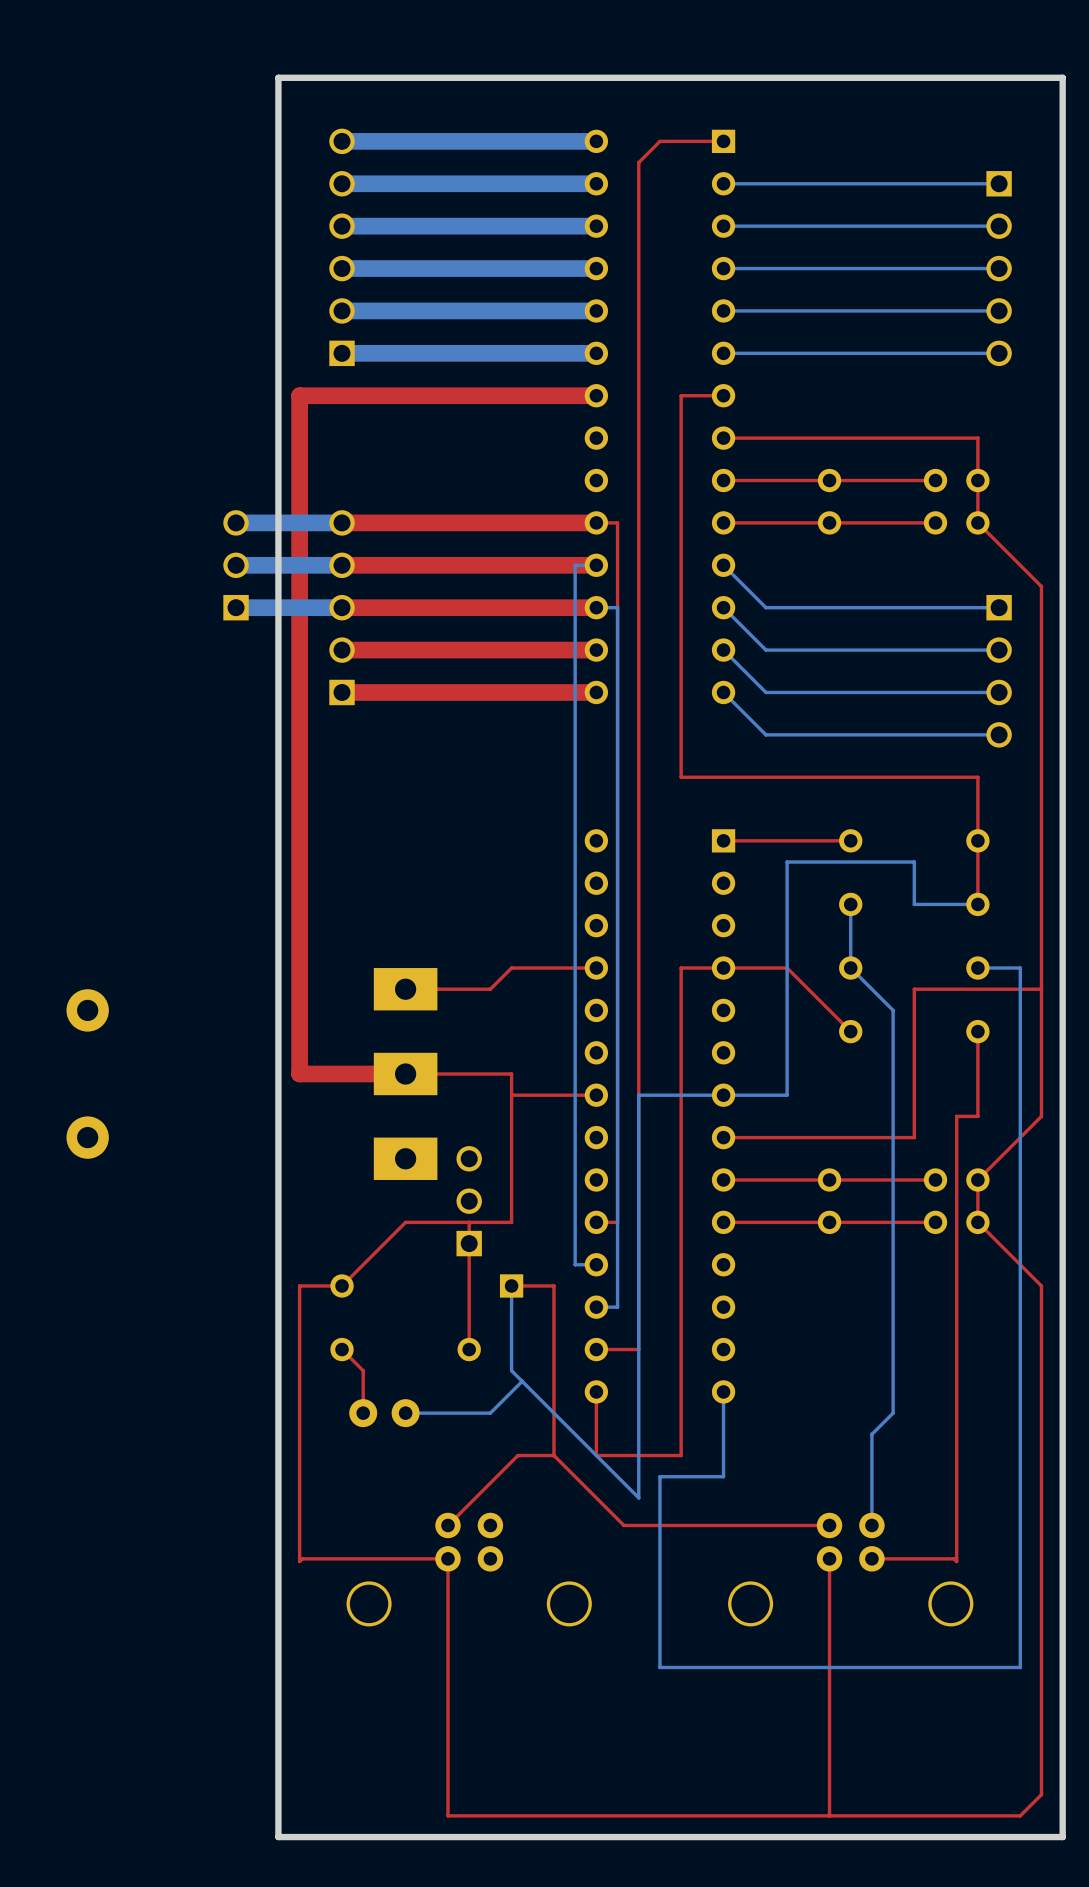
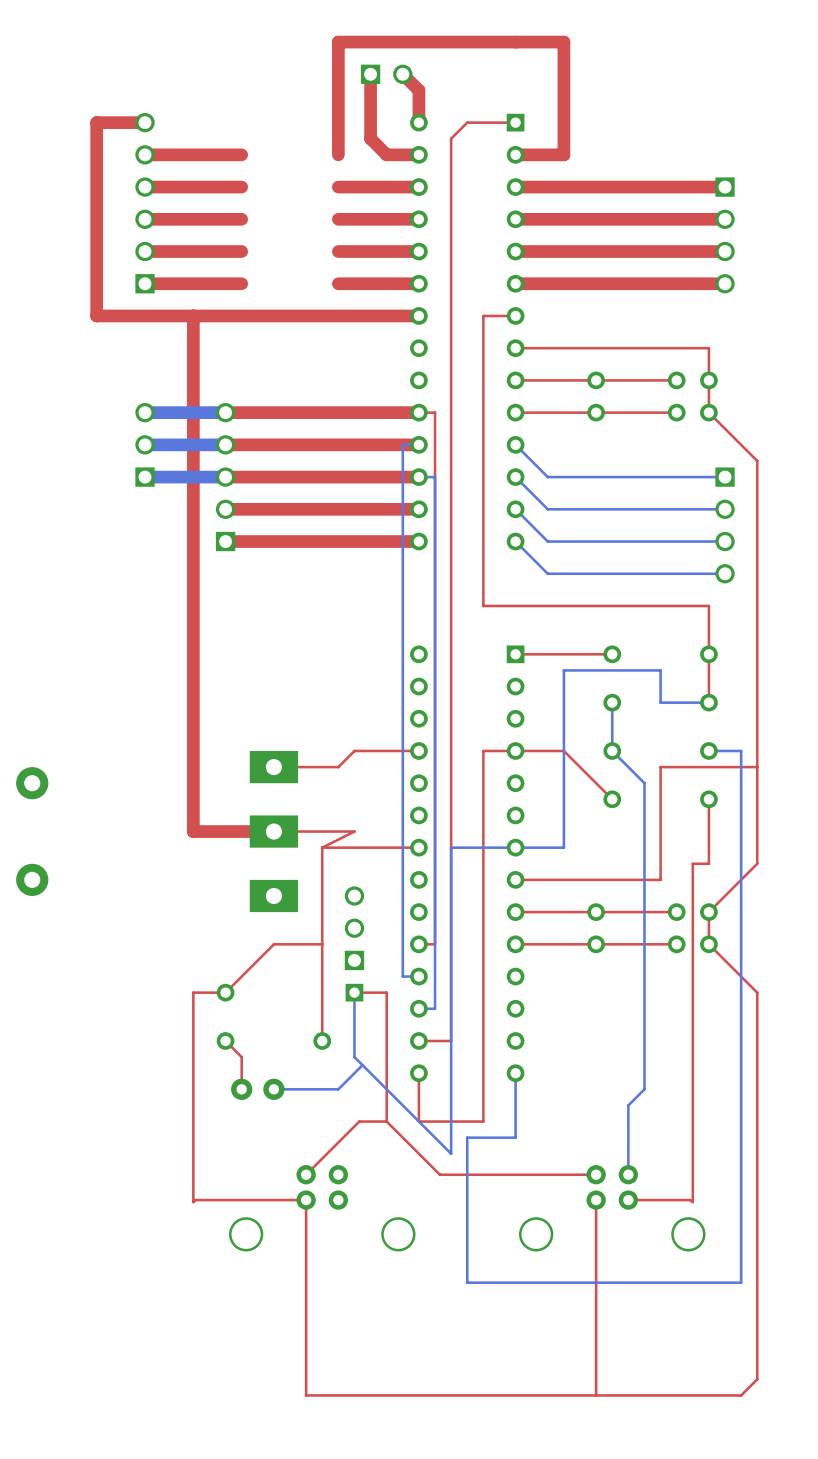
top track: none -> (370, 74) (370, 138) (386, 154) (418, 154)
part: none -> (386, 74)
top track: none -> (402, 74) (418, 90) (418, 122)
board edge: (1062, 77) (278, 77) (278, 1837) (1062, 1837) (1062, 77) -> none
top track: none -> (145, 122) (96, 122) (96, 315) (193, 315)
bottom track: (596, 141) (342, 141) -> none
top track: none -> (241, 154) (145, 154)
bottom track: (596, 183) (342, 183) -> none
top track: none -> (515, 154) (563, 154) (563, 42) (338, 42) (338, 154)
bottom track: (999, 183) (723, 183) -> none
top track: none -> (241, 187) (145, 187)
top track: none -> (418, 187) (338, 187)
bottom track: (596, 226) (342, 226) -> none
top track: none -> (725, 187) (515, 187)
bottom track: (999, 226) (723, 226) -> none
part position: (342, 247) -> (145, 203)
top track: none -> (241, 219) (145, 219)
top track: none -> (418, 219) (338, 219)
bottom track: (596, 268) (342, 268) -> none
top track: none -> (725, 219) (515, 219)
bottom track: (999, 268) (723, 268) -> none
part: (999, 268) -> none
part: none -> (725, 235)
top track: none -> (241, 251) (145, 251)
top track: none -> (418, 251) (338, 251)
bottom track: (596, 310) (342, 310) -> none
top track: none -> (725, 251) (515, 251)
bottom track: (999, 310) (723, 310) -> none
top track: none -> (241, 283) (145, 283)
top track: none -> (418, 283) (338, 283)
bottom track: (596, 353) (342, 353) -> none
top track: none -> (725, 283) (515, 283)
bottom track: (999, 353) (723, 353) -> none
top track: (511, 1074) (511, 1222) (469, 1222) -> (322, 847) (322, 944)
top track: none -> (354, 831) (322, 847)
top track: none -> (354, 847) (322, 847)
part position: (469, 1201) -> (354, 928)

